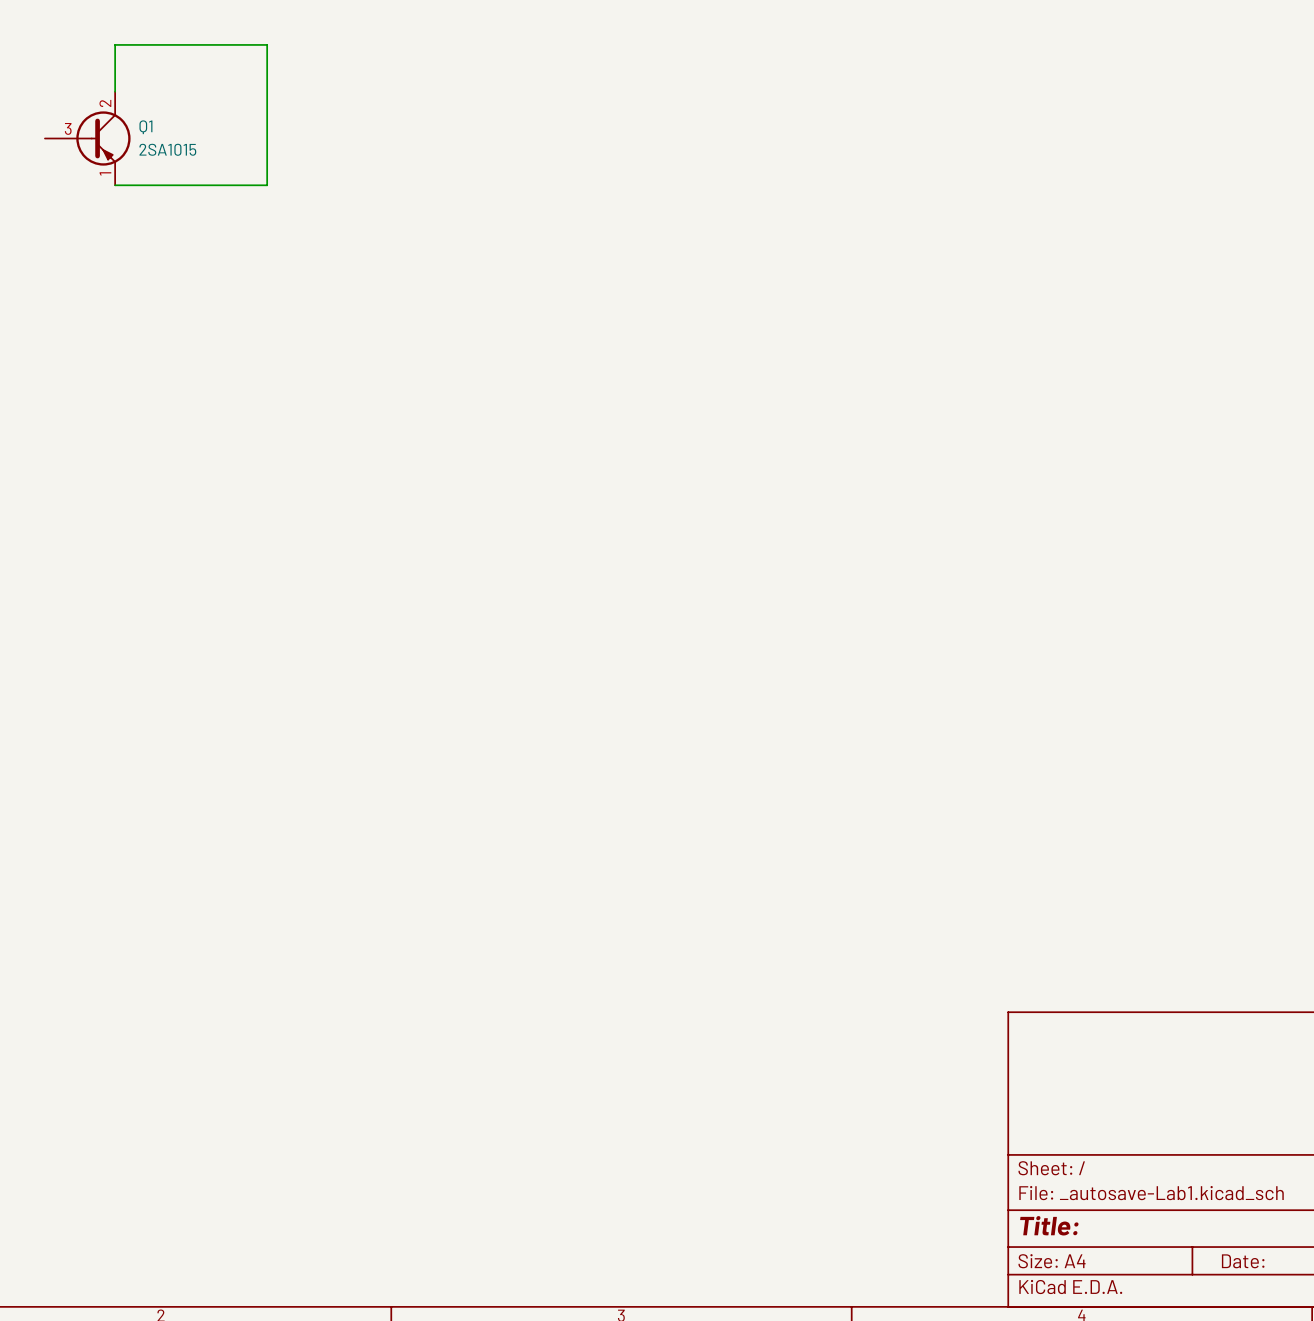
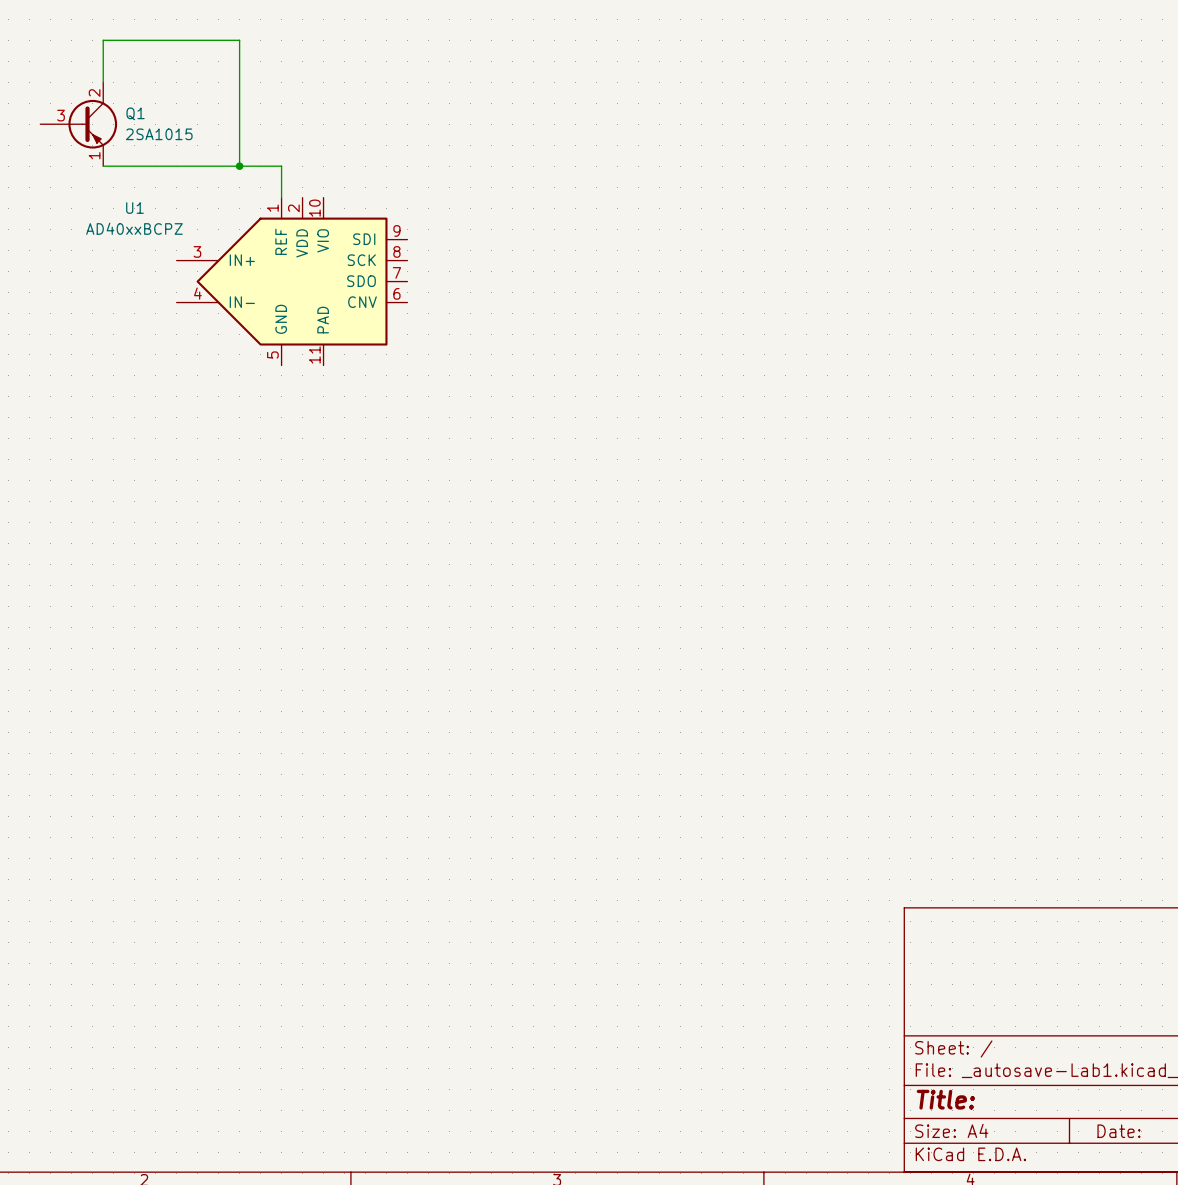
wire: none -> (239, 166) (281, 166) (281, 197)
junction: none -> (239, 166)
U1: none -> AD40xxBCPZ (292, 281)

